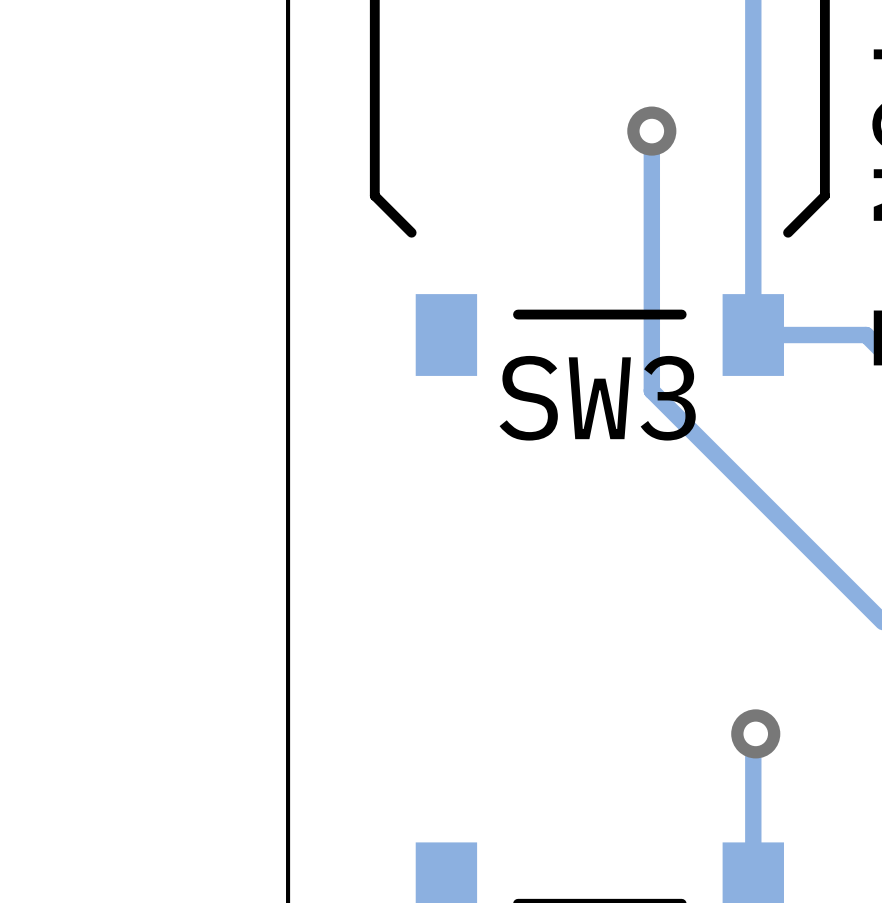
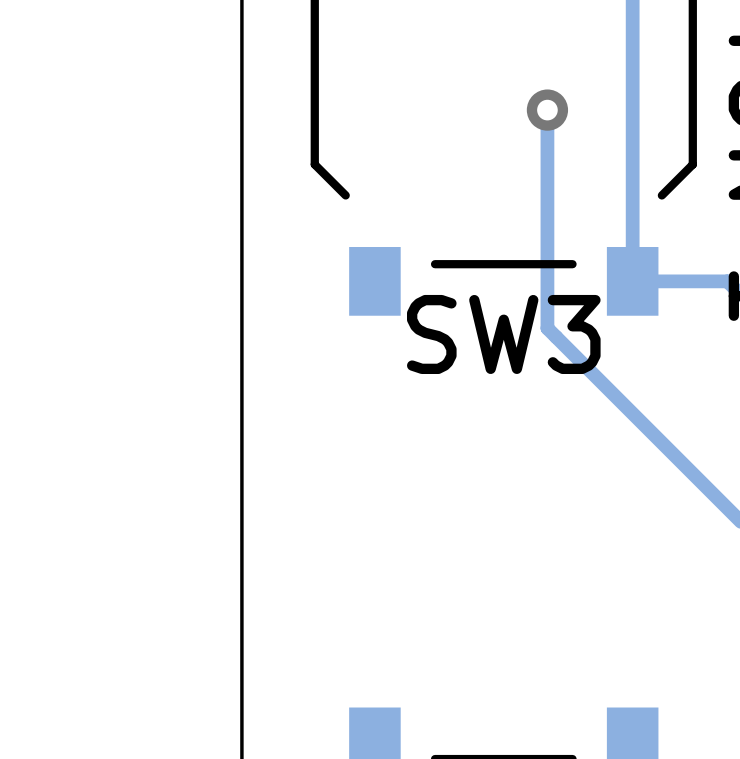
track: (755, 733) (753, 736) (753, 883) -> none
via: (755, 733) -> none

